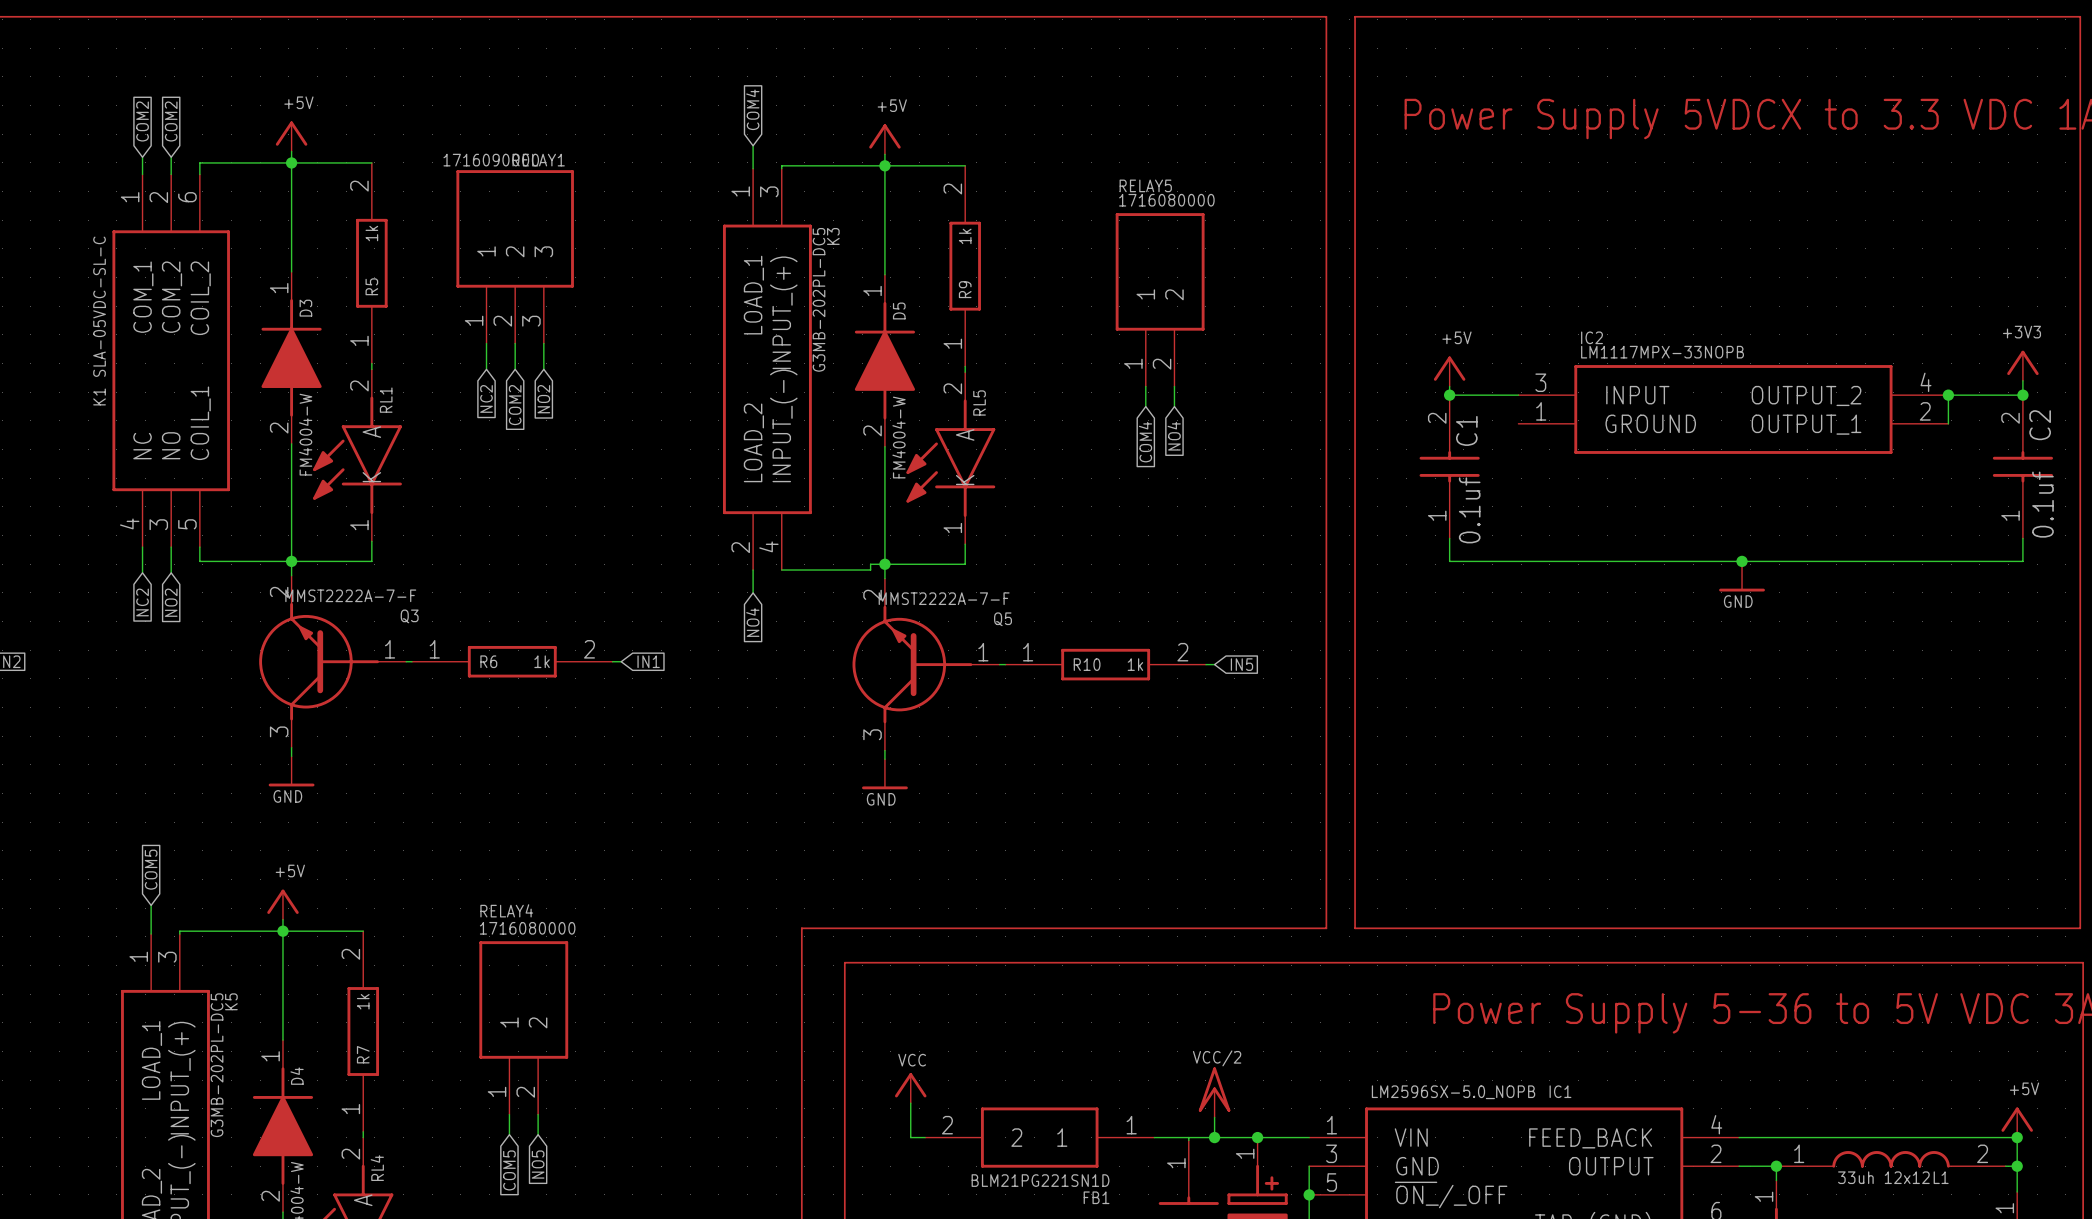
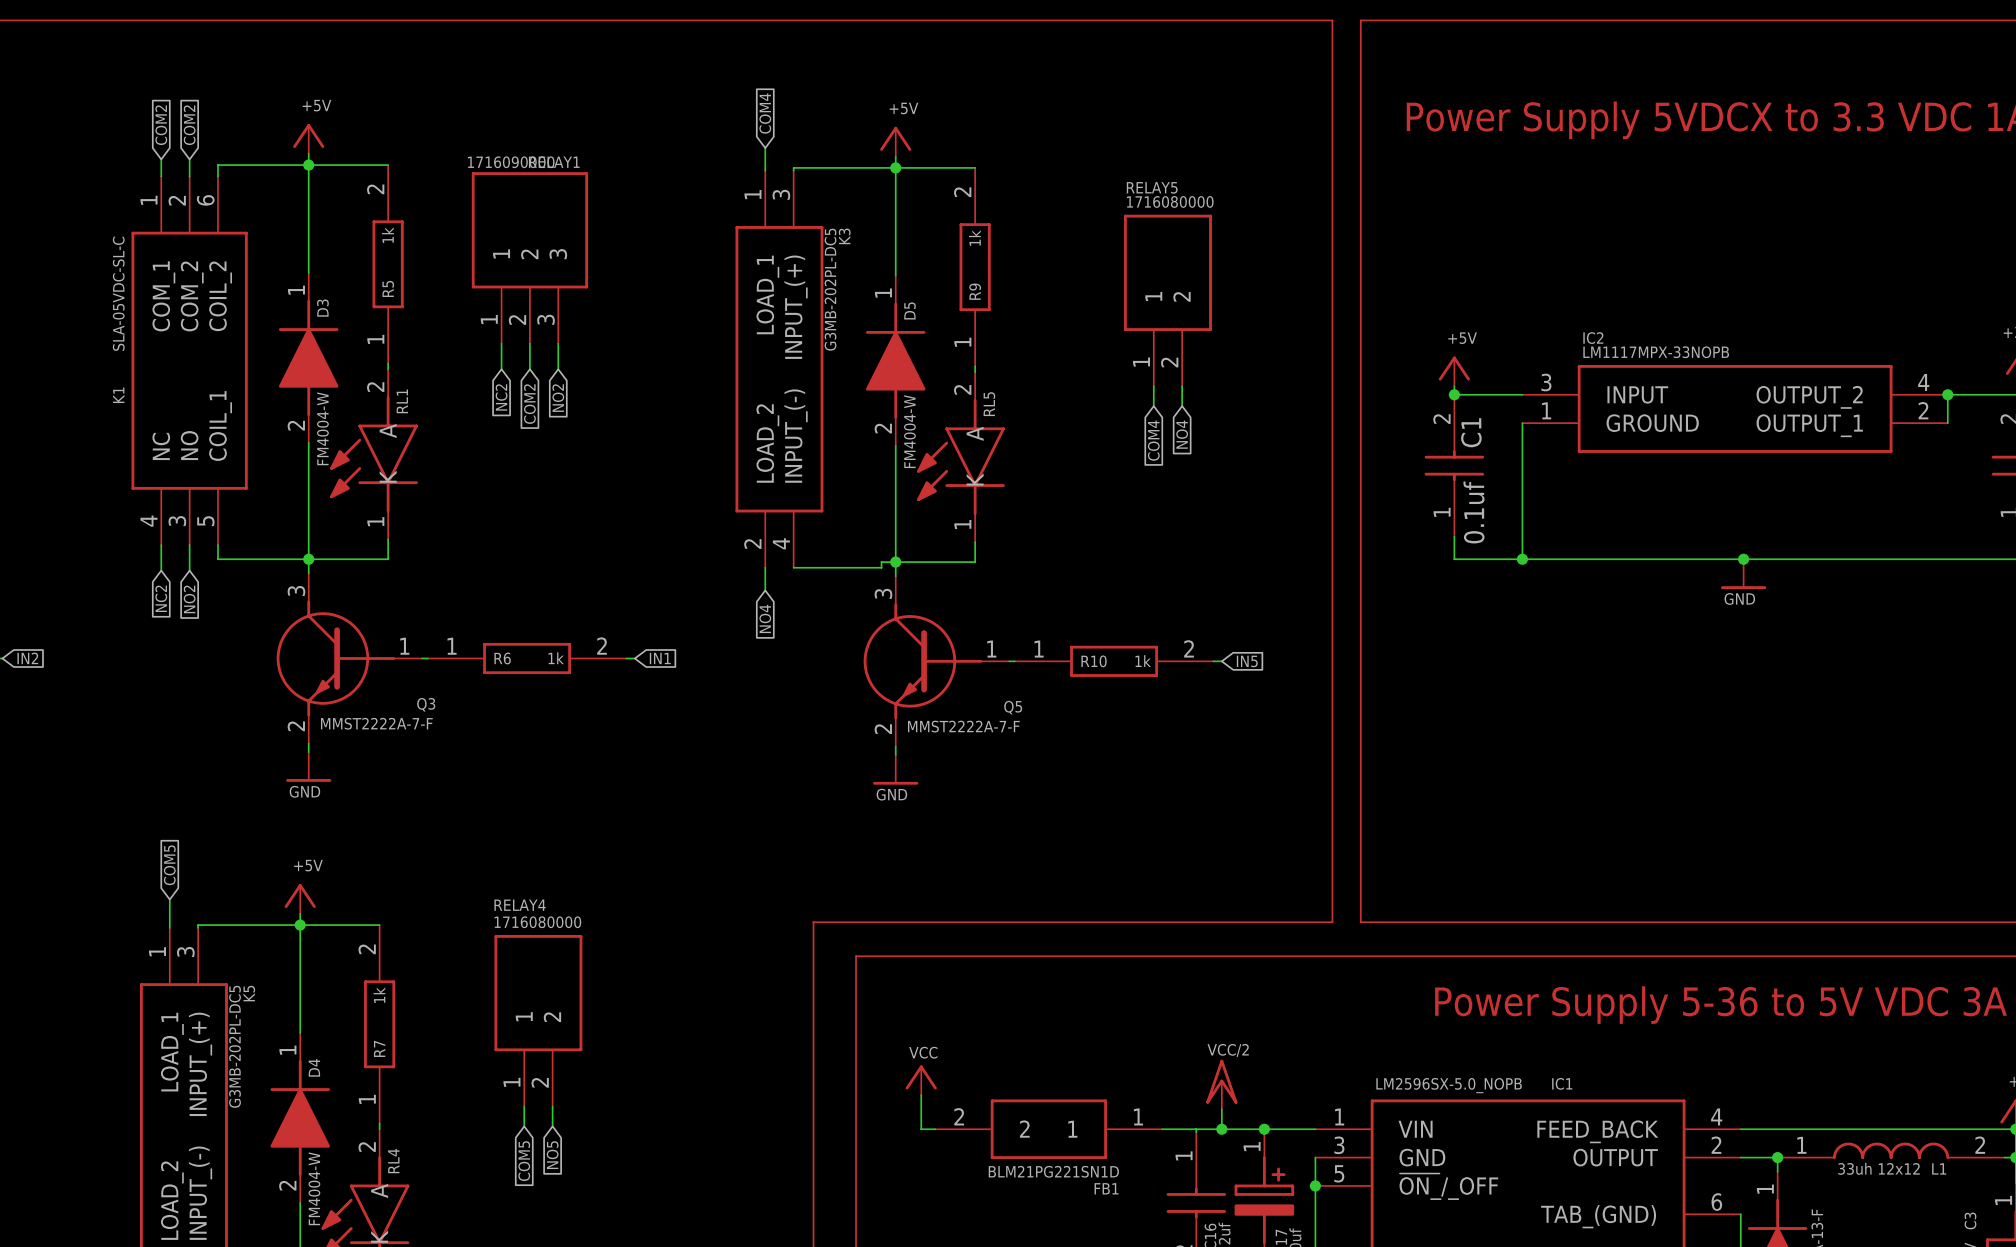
wire: none -> (1522, 423) (1522, 559)
junction: none -> (1522, 559)
Q3 flip: as is (319, 661) -> up-down (335, 658)
Q5 flip: as is (912, 664) -> up-down (922, 661)

